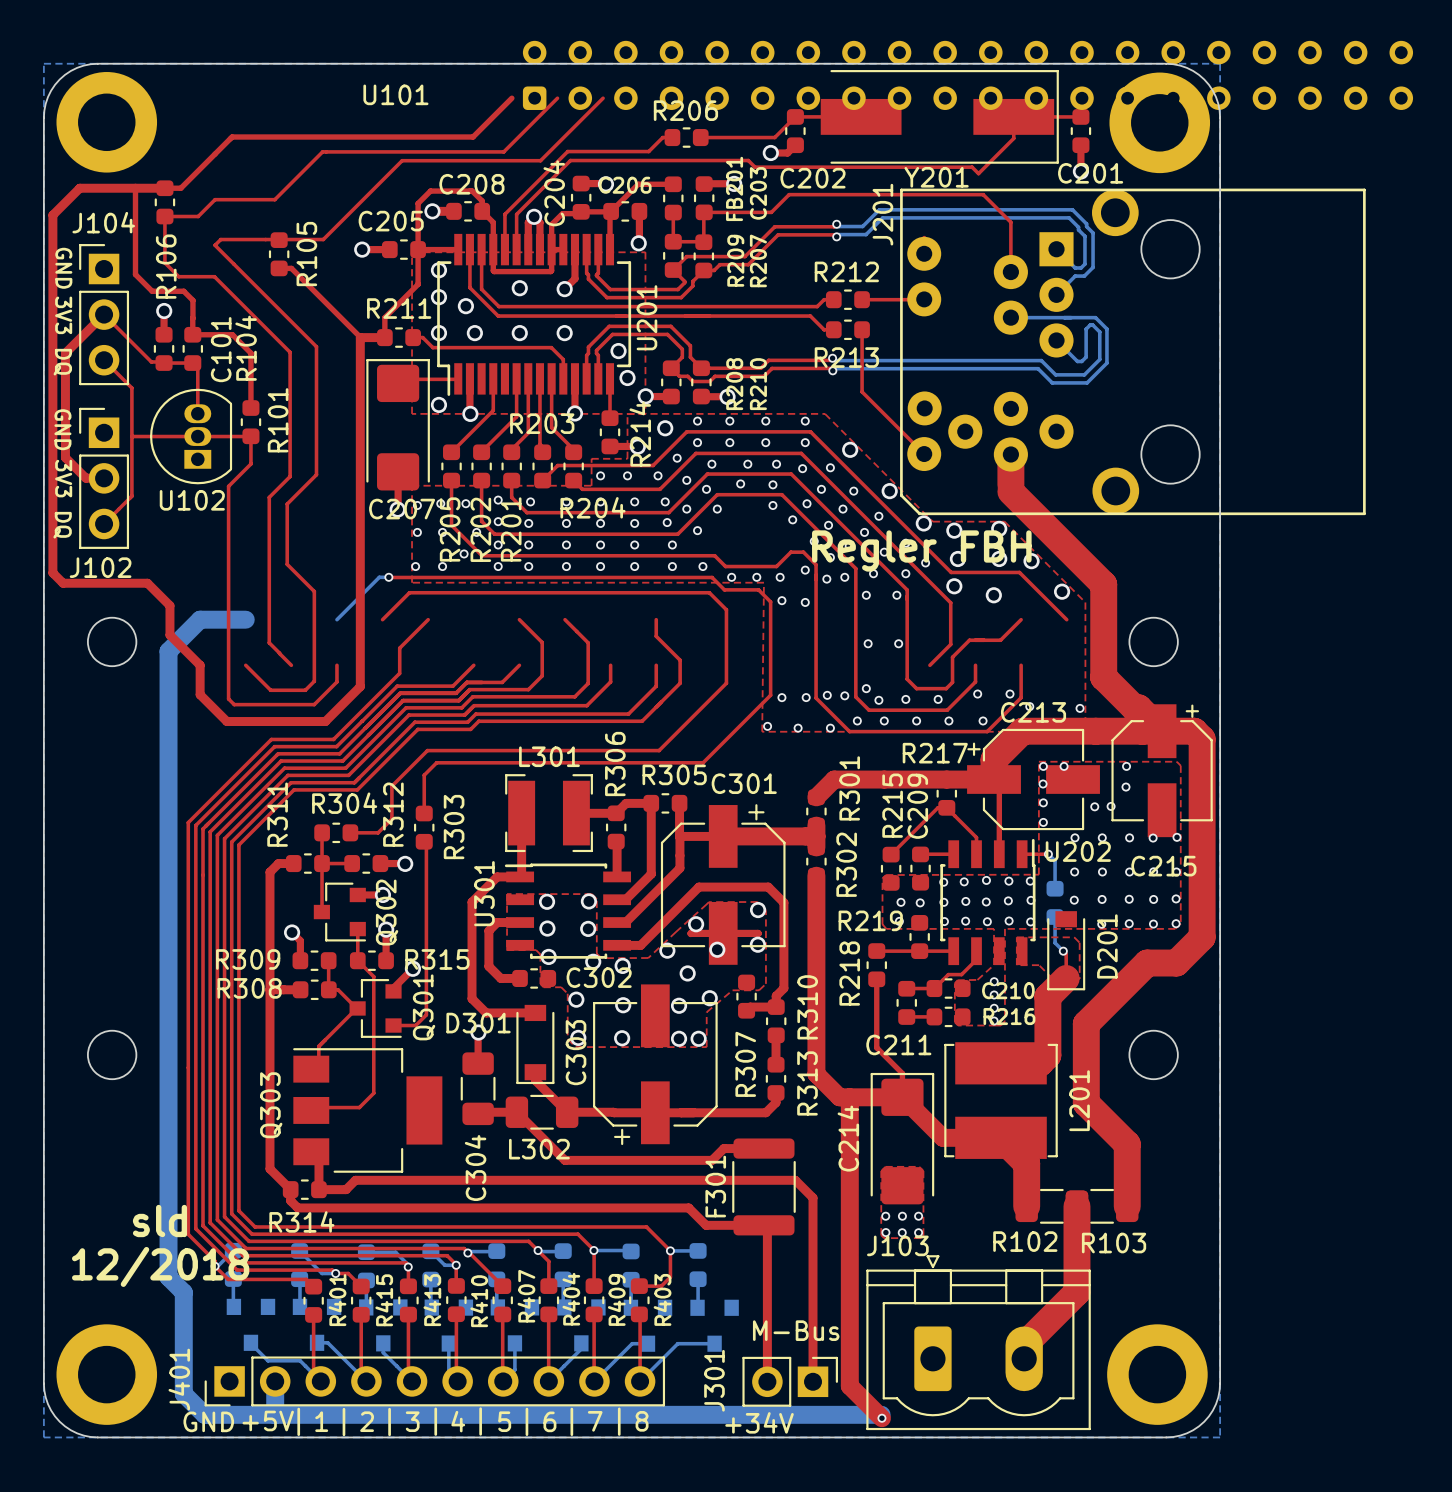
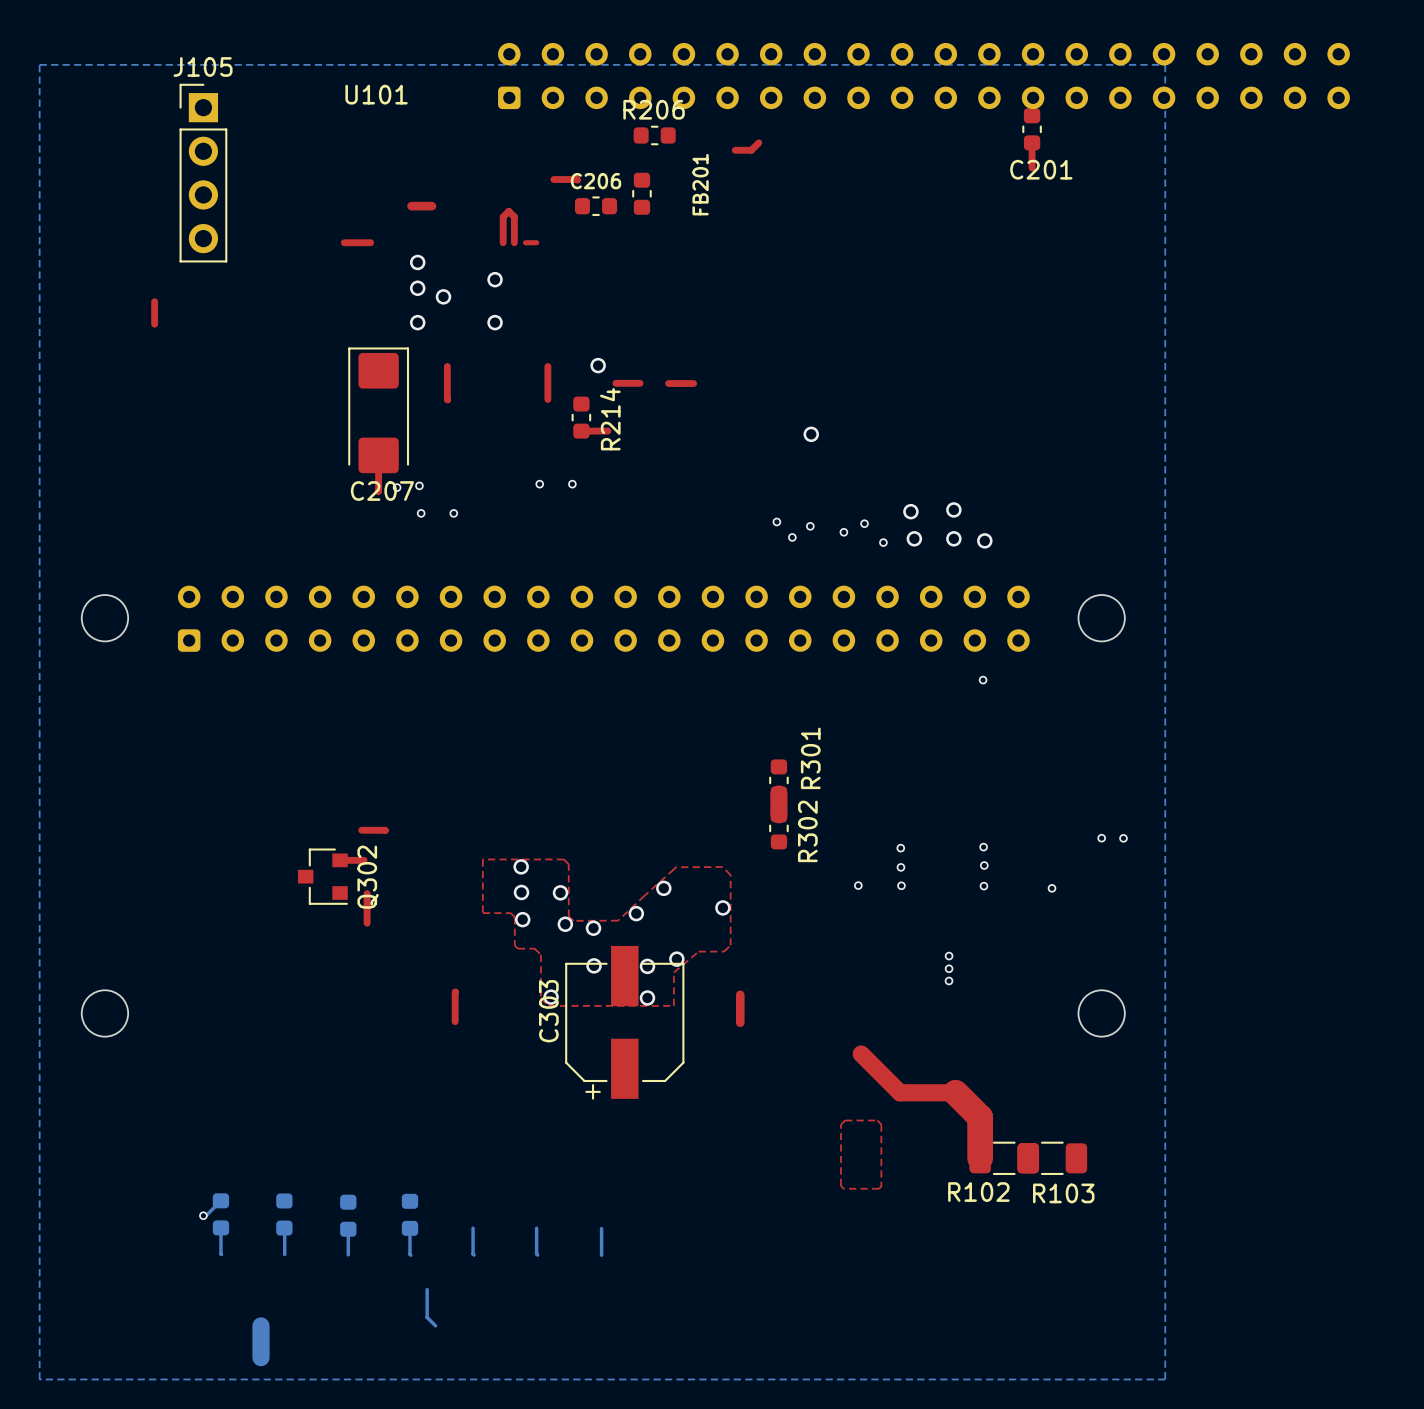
board edge: (97, 63) (1166, 63) (1180, 65) (1193, 70) (1208, 84) (1215, 97) (1220, 117) (1220, 1383) (1215, 1404) (1208, 1416) (1199, 1426) (1186, 1433) (1166, 1437) (97, 1437) (77, 1433) (64, 1426) (55, 1416) (48, 1404) (43, 1383) (43, 117) (48, 97) (59, 79) (77, 67) (97, 63) -> none
top track: (511, 98) (473, 137) (232, 137) (180, 188) (79, 188) (52, 215) (52, 573) (63, 583) (147, 583) (169, 605) (169, 635) (200, 665) (200, 694) (226, 721) (325, 721) (360, 686) (360, 337) (384, 337) -> none
top track: (557, 98) (503, 151) (322, 151) (274, 199) (215, 199) (198, 216) (164, 216) (164, 262) (178, 276) (214, 276) (290, 352) (290, 476) (269, 497) (269, 642) (279, 653) -> none
top track: (603, 98) (540, 160) (402, 160) (323, 239) (220, 239) (215, 245) (316, 346) (316, 474) (287, 504) (287, 564) (314, 591) (314, 681) (305, 690) (270, 690) (245, 665) -> none
top track: (861, 116) (795, 116) (774, 137) (700, 137) -> none
Y201: (939, 116) -> none
top track: (1080, 116) (1013, 116) (1013, 138) (978, 173) (972, 167) (755, 167) (748, 160) (570, 160) (516, 214) (516, 249) -> none
part: (106, 122) -> none
part: (1159, 122) -> none
C202: (795, 131) -> none
top track: (672, 137) (662, 137) (648, 151) (567, 151) (504, 214) (504, 249) -> none
via: (770, 152) -> none
via: (1080, 171) -> none
J105: none -> (203, 173)
top track: (705, 183) (734, 183) -> none
via: (734, 183) -> none
via: (605, 184) -> none
top track: (673, 184) (638, 184) (610, 212) (610, 249) -> none
top track: (135, 188) (135, 274) (152, 291) (183, 291) (192, 300) (192, 318) -> none
C204: (581, 197) -> none
C203: (704, 198) -> none
R106: (164, 202) -> none
via: (432, 211) -> none
C208: (468, 211) -> none
top track: (581, 211) (610, 211) -> none
top track: (639, 211) (638, 243) -> none
top track: (673, 212) (673, 241) (703, 242) -> none
top track: (581, 213) (562, 213) (551, 224) (550, 271) (494, 271) (493, 222) (482, 211) (482, 201) (472, 191) (430, 191) (418, 203) (418, 283) -> none
via: (534, 216) -> none
top track: (836, 224) (834, 226) (774, 226) (744, 256) (686, 256) (673, 270) (684, 281) (677, 289) (610, 289) (596, 275) (598, 273) (598, 249) -> none
bottom track: (836, 224) (838, 226) (862, 226) (879, 209) (1072, 209) (1093, 232) (1093, 267) (1084, 276) (1075, 276) (1056, 294) -> none
via: (836, 224) -> none
top track: (836, 236) (834, 234) (778, 234) (748, 264) (719, 264) (714, 270) (703, 270) (692, 281) (692, 286) (681, 297) (606, 297) (588, 279) (586, 249) -> none
bottom track: (836, 236) (838, 234) (866, 234) (882, 217) (1069, 217) (1084, 236) (1084, 264) (1081, 268) (1075, 268) (1056, 249) -> none
via: (836, 236) -> none
top track: (703, 242) (704, 212) (771, 212) (789, 194) (983, 194) (1010, 222) (1010, 272) -> none
via: (638, 243) -> none
via: (362, 249) -> none
C205: (403, 249) -> none
top track: (418, 249) (458, 249) -> none
top track: (469, 249) (469, 287) (498, 316) (810, 316) (824, 329) (833, 329) -> none
top track: (481, 249) (481, 289) (498, 306) (817, 306) (824, 299) (833, 299) -> none
top track: (574, 249) (574, 278) (564, 289) -> none
R105: (279, 254) -> none
R209: (673, 255) -> none
R207: (703, 256) -> none
text: GND (63, 268) -> none
top track: (279, 268) (291, 268) (360, 337) (384, 337) -> none
top track: (418, 284) (384, 317) (384, 337) -> none
via: (564, 289) -> none
R212: (847, 299) -> none
top track: (924, 299) (862, 299) -> none
via: (164, 311) -> none
J104: (104, 314) -> none
U201: (534, 314) -> none
text: 3V3 (63, 315) -> none
bottom track: (1010, 317) (1095, 317) (1106, 329) (1106, 363) (1087, 382) (1052, 382) (1038, 368) (834, 368) (832, 370) -> none
top track: (192, 318) (192, 334) (232, 334) (250, 353) (250, 408) -> none
R213: (847, 329) -> none
top track: (862, 329) (862, 391) (924, 454) -> none
via: (474, 333) -> none
via: (564, 333) -> none
R211: (399, 337) -> none
top track: (413, 337) (422, 337) (432, 347) (551, 347) (563, 359) (563, 378) -> none
bottom track: (1056, 340) (1077, 361) (1081, 361) (1086, 357) (1086, 329) (1092, 325) (1099, 332) (1099, 359) (1084, 374) (1055, 374) (1041, 360) (834, 360) (832, 358) -> none
C101: (164, 348) -> none
R104: (192, 348) -> none
via: (618, 351) -> none
J201: (1132, 351) -> none
top track: (832, 358) (830, 360) (768, 360) (760, 368) (701, 368) (690, 357) (690, 345) (670, 326) (609, 326) (588, 347) (586, 378) -> none
via: (832, 358) -> none
top track: (104, 360) (131, 388) (131, 496) -> none
top track: (163, 361) (151, 361) (104, 314) (65, 353) (65, 457) (85, 478) (103, 478) -> none
text: DQ (62, 362) -> none
top track: (164, 363) (192, 363) (197, 368) (197, 413) -> none
top track: (832, 370) (830, 368) (772, 368) (764, 376) (715, 376) (709, 381) (692, 381) (687, 376) (679, 376) (671, 368) (682, 357) (682, 349) (667, 334) (612, 334) (596, 350) (598, 378) -> none
via: (832, 370) -> none
top track: (458, 378) (398, 379) -> none
top track: (493, 378) (493, 410) (451, 452) -> none
top track: (516, 378) (516, 416) (482, 451) -> none
top track: (528, 378) (528, 432) (512, 449) -> none
top track: (539, 378) (539, 444) (544, 449) -> none
top track: (551, 378) (551, 427) (575, 451) -> none
top track: (610, 378) (610, 418) -> none
R208: (671, 382) -> none
R210: (701, 382) -> none
via: (645, 396) -> none
via: (727, 396) -> none
via: (438, 404) -> none
via: (470, 413) -> none
via: (574, 413) -> none
top zone outline: (627, 413) (627, 458) (591, 458) (591, 485) (412, 485) (412, 582) (763, 582) (762, 731) (1085, 731) (1085, 602) (1004, 521) (932, 521) (825, 413) (412, 413) (412, 252) (645, 252) (645, 413) -> none
via: (697, 421) -> none
via: (729, 421) -> none
via: (765, 421) -> none
via: (805, 421) -> none
R101: (250, 422) -> none
via: (665, 428) -> none
text: GND (62, 429) -> none
top track: (132, 436) (250, 436) -> none
U102: (191, 436) -> none
top track: (250, 436) (250, 463) -> none
via: (697, 442) -> none
via: (729, 442) -> none
via: (765, 442) -> none
via: (805, 442) -> none
via: (637, 446) -> none
top track: (1010, 454) (1010, 491) (1103, 584) (1103, 677) -> none
via: (677, 458) -> none
top track: (251, 463) (228, 486) (228, 698) (234, 704) (314, 704) (336, 681) (336, 665) -> none
via: (711, 464) -> none
via: (747, 464) -> none
via: (776, 464) -> none
R205: (451, 466) -> none
R202: (481, 466) -> none
R201: (511, 466) -> none
R203: (542, 466) -> none
R204: (573, 466) -> none
via: (830, 467) -> none
via: (802, 468) -> none
via: (600, 475) -> none
via: (627, 475) -> none
via: (658, 475) -> none
text: 3V3 (63, 478) -> none
J102: (104, 478) -> none
top track: (451, 480) (451, 525) (482, 555) (714, 555) (725, 566) (776, 566) (790, 552) (803, 552) (816, 564) (816, 698) (849, 731) (987, 731) (1021, 697) (1021, 665) -> none
top track: (481, 480) (481, 521) (494, 534) (677, 534) (717, 494) (781, 494) (855, 568) (855, 697) (869, 710) (947, 710) (975, 681) (975, 665) -> none
top track: (511, 480) (511, 497) (526, 512) (668, 512) (707, 474) (791, 474) (907, 589) (907, 679) (916, 688) (946, 688) (952, 682) (952, 657) (969, 640) (1000, 640) (1021, 619) -> none
top track: (542, 480) (557, 465) (653, 465) (686, 431) (810, 431) (951, 572) (1019, 572) (1066, 619) -> none
top track: (573, 480) (582, 489) (660, 489) (695, 453) (801, 453) (950, 602) (950, 644) (929, 665) -> none
via: (686, 480) -> none
via: (740, 483) -> none
via: (772, 484) -> none
via: (706, 489) -> none
via: (821, 489) -> none
via: (853, 491) -> none
via: (889, 491) -> none
top track: (132, 495) (104, 523) -> none
via: (498, 500) -> none
via: (530, 501) -> none
via: (634, 501) -> none
via: (665, 501) -> none
via: (465, 503) -> none
via: (807, 503) -> none
via: (772, 505) -> none
via: (397, 509) -> none
via: (686, 509) -> none
via: (717, 509) -> none
via: (842, 509) -> none
via: (878, 516) -> none
via: (792, 519) -> none
via: (498, 521) -> none
via: (667, 522) -> none
via: (528, 523) -> none
via: (566, 523) -> none
via: (600, 523) -> none
via: (634, 523) -> none
via: (923, 523) -> none
text: DQ (62, 525) -> none
via: (828, 525) -> none
via: (697, 530) -> none
via: (417, 532) -> none
via: (864, 532) -> none
via: (498, 544) -> none
via: (528, 544) -> none
via: (566, 544) -> none
via: (600, 544) -> none
via: (634, 544) -> none
via: (672, 544) -> none
text: Regler FBH (921, 550) -> none
via: (464, 553) -> none
via: (415, 566) -> none
via: (442, 566) -> none
via: (498, 566) -> none
via: (528, 566) -> none
via: (566, 566) -> none
via: (600, 566) -> none
via: (634, 566) -> none
via: (672, 566) -> none
via: (702, 566) -> none
via: (805, 570) -> none
via: (873, 573) -> none
via: (905, 573) -> none
bottom track: (388, 577) (379, 577) (336, 619) -> none
via: (388, 577) -> none
top track: (389, 577) (712, 577) (724, 589) (758, 589) (770, 601) (770, 695) (703, 762) (436, 762) (424, 775) (424, 813) -> none
via: (731, 577) -> none
via: (756, 577) -> none
via: (780, 577) -> none
via: (844, 577) -> none
via: (826, 579) -> none
via: (954, 586) -> none
via: (1062, 591) -> none
via: (866, 595) -> none
via: (896, 595) -> none
via: (993, 595) -> none
via: (781, 600) -> none
via: (805, 602) -> none
bottom track: (245, 619) (200, 619) (168, 651) (168, 1277) (183, 1292) (183, 1393) (204, 1414) (881, 1414) -> none
top track: (382, 619) (409, 592) (709, 592) (726, 609) (726, 683) (659, 750) (427, 750) (391, 786) (391, 819) (378, 832) (350, 832) -> none
top track: (428, 619) (399, 648) (399, 673) -> none
top track: (519, 619) (542, 642) (542, 675) (528, 689) (469, 689) (458, 700) (403, 700) -> none
top track: (565, 619) (588, 642) (588, 683) (574, 696) (472, 696) (461, 707) (406, 707) (345, 768) (284, 768) (217, 835) (217, 1219) (246, 1248) (464, 1248) (502, 1286) -> none
top track: (656, 619) (656, 636) (680, 660) (680, 683) (642, 721) (478, 721) (470, 729) (417, 729) (357, 789) (293, 789) (238, 844) (238, 1210) (255, 1226) (646, 1226) (670, 1250) (670, 1277) (661, 1286) (639, 1286) -> none
part: none -> (603, 618)
via: (868, 643) -> none
via: (898, 643) -> none
top track: (279, 653) (291, 665) -> none
top track: (473, 665) (452, 686) (397, 686) (362, 720) -> none
top track: (519, 665) (502, 682) (466, 682) (455, 693) (400, 693) (339, 753) (278, 753) (203, 828) (203, 1225) (240, 1262) (406, 1262) (408, 1265) (408, 1286) -> none
top track: (610, 665) (610, 681) (586, 705) (474, 705) (464, 715) (409, 715) (348, 775) (287, 775) (224, 838) (224, 1216) (249, 1241) (528, 1241) (548, 1261) (548, 1286) -> none
top track: (656, 665) (656, 686) (628, 714) (475, 714) (467, 722) (414, 722) (354, 782) (291, 782) (231, 842) (231, 1213) (252, 1234) (577, 1234) (593, 1250) -> none
top track: (399, 673) (333, 739) -> none
top track: (1103, 677) (1134, 707) (1138, 707) (1162, 731) -> none
via: (866, 688) -> none
via: (977, 694) -> none
via: (1009, 694) -> none
via: (827, 695) -> none
via: (844, 695) -> none
via: (781, 697) -> none
via: (806, 697) -> none
via: (905, 699) -> none
via: (938, 699) -> none
top track: (458, 700) (403, 700) (342, 761) (281, 761) (210, 831) (210, 1222) (243, 1255) (447, 1255) (456, 1264) (456, 1285) -> none
via: (878, 700) -> none
via: (1080, 708) -> none
top track: (362, 720) (336, 746) (274, 746) (195, 825) (195, 1228) (237, 1270) (332, 1270) (335, 1273) (348, 1273) (361, 1286) -> none
via: (857, 720) -> none
via: (884, 720) -> none
via: (916, 720) -> none
via: (948, 720) -> none
via: (983, 720) -> none
via: (767, 726) -> none
via: (798, 728) -> none
via: (830, 728) -> none
top track: (333, 739) (271, 739) (188, 822) (188, 1234) (215, 1261) (215, 1266) (228, 1279) (306, 1279) (313, 1286) -> none
top zone outline: (1038, 761) (1038, 874) (886, 875) (882, 878) (882, 924) (886, 928) (994, 928) (994, 965) (977, 979) (957, 980) (954, 983) (954, 1022) (958, 1025) (1001, 1025) (1004, 1021) (1004, 928) (1175, 928) (1180, 923) (1180, 765) (1176, 761) (1038, 761) -> none
via: (1043, 766) -> none
via: (1064, 766) -> none
via: (1126, 766) -> none
C215: (1162, 770) -> none
top track: (993, 779) (834, 779) (816, 797) -> none
top track: (994, 779) (999, 784) (999, 854) -> none
top track: (994, 779) (994, 759) (1022, 731) (1194, 731) (1202, 739) (1202, 937) (1176, 963) (1147, 963) (1086, 1023) (1086, 1103) (1127, 1144) (1127, 1206) -> none
C213: (1033, 779) -> none
via: (1043, 784) -> none
via: (1125, 787) -> none
R217: (946, 793) -> none
via: (1043, 802) -> none
R305: (665, 803) -> none
top track: (679, 803) (679, 836) -> none
via: (1094, 806) -> none
via: (1111, 806) -> none
top track: (521, 813) (521, 875) (497, 876) (472, 902) (472, 998) (486, 1012) (535, 1012) -> none
L301: (549, 813) -> none
top track: (576, 813) (616, 813) (626, 803) (651, 803) (651, 874) (625, 899) (617, 899) -> none
via: (1043, 822) -> none
R303: (424, 827) -> none
R306: (616, 827) -> none
top track: (322, 832) (322, 911) -> none
R304: (336, 832) -> none
top track: (816, 836) (679, 836) (679, 868) (625, 922) (617, 922) -> none
via: (1075, 837) -> none
via: (1102, 837) -> none
via: (1129, 837) -> none
via: (1176, 837) -> none
via: (1153, 838) -> none
top track: (426, 841) (426, 1014) (415, 1025) (393, 1025) -> none
top track: (616, 841) (617, 876) -> none
top track: (920, 854) (953, 854) -> none
top track: (976, 854) (976, 837) (946, 807) (937, 807) (891, 854) -> none
top track: (1022, 854) (1048, 854) -> none
bottom track: (1048, 854) (1055, 860) (1055, 888) -> none
via: (1048, 854) -> none
top track: (293, 863) (278, 863) (269, 872) (269, 1168) (290, 1189) (290, 1200) (297, 1207) (688, 1207) (706, 1225) (763, 1225) (767, 1228) (767, 1381) -> none
R311: (307, 863) -> none
top track: (322, 863) (352, 863) -> none
R312: (366, 863) -> none
via: (405, 863) -> none
R215: (891, 868) -> none
C209: (920, 868) -> none
via: (1074, 871) -> none
via: (1102, 871) -> none
via: (1129, 871) -> none
top track: (816, 875) (816, 1074) (839, 1097) (902, 1097) (902, 1073) (876, 1047) (876, 979) -> none
via: (986, 880) -> none
via: (964, 881) -> none
via: (1008, 881) -> none
C301: (723, 884) -> none
via: (382, 894) -> none
via: (1176, 898) -> none
via: (1102, 899) -> none
via: (1129, 899) -> none
via: (1153, 899) -> none
via: (1008, 900) -> none
via: (1074, 900) -> none
via: (588, 901) -> none
via: (965, 901) -> none
via: (986, 901) -> none
via: (900, 902) -> none
via: (920, 902) -> none
U202: (987, 902) -> none
part: (1055, 902) -> none
via: (758, 910) -> none
U301: (567, 911) -> none
bottom track: (1055, 917) (1055, 942) (1063, 951) -> none
via: (965, 921) -> none
via: (987, 921) -> none
via: (1009, 921) -> none
top track: (520, 922) (497, 922) (488, 930) (488, 966) (500, 978) (519, 978) -> none
via: (1129, 923) -> none
via: (1176, 923) -> none
via: (1153, 924) -> none
top track: (357, 929) (357, 960) (373, 976) (373, 1093) (359, 1107) (318, 1107) -> none
via: (386, 929) -> none
top track: (292, 932) (300, 940) (300, 960) -> none
via: (292, 932) -> none
top track: (691, 933) (758, 933) -> none
R219: (919, 936) -> none
top zone outline: (1016, 937) (1074, 937) (1079, 942) (1079, 979) (1052, 979) (1039, 965) (1016, 965) (1016, 937) -> none
top track: (625, 945) (640, 945) (698, 887) (768, 887) (783, 902) (783, 988) (776, 996) (776, 1007) (750, 1007) (746, 1010) -> none
via: (717, 949) -> none
D201: (1066, 950) -> none
top track: (876, 951) (953, 951) -> none
top track: (976, 951) (976, 959) (961, 974) (948, 974) (934, 988) (906, 988) -> none
top track: (1063, 951) (1066, 954) (1066, 978) (1047, 996) (1047, 1055) (1039, 1063) (1001, 1063) -> none
via: (1063, 951) -> none
R309: (314, 960) -> none
top track: (328, 960) (328, 989) -> none
R315: (371, 960) -> none
R218: (876, 965) -> none
top track: (412, 968) (393, 988) (393, 991) -> none
via: (412, 968) -> none
via: (687, 973) -> none
C302: (534, 978) -> none
via: (994, 981) -> none
C210: (948, 988) -> none
top track: (269, 989) (300, 989) -> none
R308: (314, 989) -> none
top track: (328, 989) (338, 989) (356, 1008) -> none
R307: (746, 996) -> none
via: (576, 999) -> none
C211: (906, 1002) -> none
top track: (356, 1008) (318, 1046) (318, 1066) -> none
Q301: (375, 1008) -> none
top track: (906, 1016) (934, 1016) -> none
R216: (948, 1016) -> none
R310: (776, 1021) -> none
via: (478, 1032) -> none
via: (622, 1038) -> none
via: (698, 1038) -> none
D301: (535, 1044) -> none
top track: (535, 1072) (535, 1080) (567, 1112) (765, 1112) (776, 1102) (776, 1092) -> none
R313: (776, 1078) -> none
C304: (478, 1088) -> none
top track: (849, 1097) (849, 1386) (881, 1418) -> none
L201: (1001, 1100) -> none
Q303: (367, 1110) -> none
L302: (542, 1112) -> none
top track: (478, 1113) (479, 1112) (516, 1112) (565, 1160) (712, 1160) (723, 1148) (763, 1148) -> none
C214: (902, 1138) -> none
top track: (318, 1149) (318, 1189) (346, 1189) (355, 1180) (795, 1180) (813, 1197) (813, 1381) -> none
F301: (763, 1186) -> none
R314: (304, 1189) -> none
top track: (1076, 1206) (1076, 1292) (1024, 1345) (1024, 1358) -> none
via: (885, 1216) -> none
via: (902, 1216) -> none
via: (918, 1216) -> none
text: sld (159, 1221) -> none
via: (885, 1232) -> none
via: (902, 1232) -> none
via: (918, 1232) -> none
bottom track: (466, 1250) (496, 1251) -> none
bottom track: (538, 1250) (563, 1251) -> none
via: (538, 1250) -> none
bottom track: (593, 1250) (631, 1251) -> none
via: (593, 1250) -> none
top track: (594, 1250) (594, 1286) -> none
via: (670, 1250) -> none
bottom track: (698, 1250) (669, 1251) -> none
bottom track: (299, 1251) (322, 1273) (335, 1273) -> none
bottom track: (430, 1251) (444, 1265) (456, 1265) -> none
bottom track: (366, 1252) (395, 1252) (408, 1265) -> none
via: (467, 1253) -> none
via: (456, 1265) -> none
part: (496, 1265) -> none
part: (563, 1265) -> none
part: (631, 1265) -> none
part: (698, 1265) -> none
text: 12/2018 (160, 1266) -> none
via: (408, 1267) -> none
via: (335, 1273) -> none
bottom track: (698, 1279) (697, 1307) -> none
R401: (313, 1300) -> none
R415: (361, 1300) -> none
R413: (408, 1300) -> none
R410: (456, 1300) -> none
R407: (502, 1300) -> none
R404: (548, 1300) -> none
R409: (594, 1300) -> none
R403: (639, 1300) -> none
top track: (313, 1314) (313, 1374) (320, 1381) -> none
top track: (361, 1314) (361, 1376) (366, 1381) -> none
top track: (408, 1314) (408, 1377) (412, 1381) -> none
top track: (456, 1314) (457, 1381) -> none
top track: (502, 1314) (503, 1381) -> none
top track: (548, 1314) (548, 1381) -> none
top track: (594, 1314) (594, 1381) -> none
top track: (639, 1314) (640, 1381) -> none
part: (250, 1324) -> none
part: (317, 1324) -> none
part: (383, 1325) -> none
part: (448, 1325) -> none
part: (514, 1325) -> none
part: (581, 1325) -> none
part: (647, 1325) -> none
part: (714, 1325) -> none
text: M-Bus (796, 1330) -> none
bottom track: (250, 1342) (268, 1360) (300, 1360) (320, 1381) -> none
bottom track: (317, 1342) (327, 1342) (366, 1381) -> none
J103: (978, 1342) -> none
bottom track: (383, 1343) (383, 1352) (412, 1381) -> none
bottom track: (514, 1343) (514, 1369) (503, 1381) -> none
bottom track: (581, 1343) (581, 1348) (548, 1381) -> none
bottom track: (647, 1343) (632, 1343) (594, 1381) -> none
bottom track: (714, 1343) (677, 1343) (640, 1381) -> none
part: (106, 1374) -> none
part: (1157, 1374) -> none
J401: (434, 1381) -> none
J301: (790, 1381) -> none
via: (881, 1418) -> none
text: +5V (268, 1420) -> none
text: GND (208, 1421) -> none
text: | (298, 1421) -> none
text: 1 (321, 1421) -> none
text: 2 (367, 1421) -> none
text: 3 (412, 1421) -> none
text: | (435, 1421) -> none
text: 4 (458, 1421) -> none
text: | (480, 1421) -> none
text: 5 (504, 1421) -> none
text: | (526, 1421) -> none
text: 6 (549, 1421) -> none
text: | (571, 1421) -> none
text: 7 (595, 1421) -> none
text: | (619, 1421) -> none
text: 8 (642, 1421) -> none
text: | (343, 1422) -> none
text: | (389, 1422) -> none
text: +34V (759, 1422) -> none

